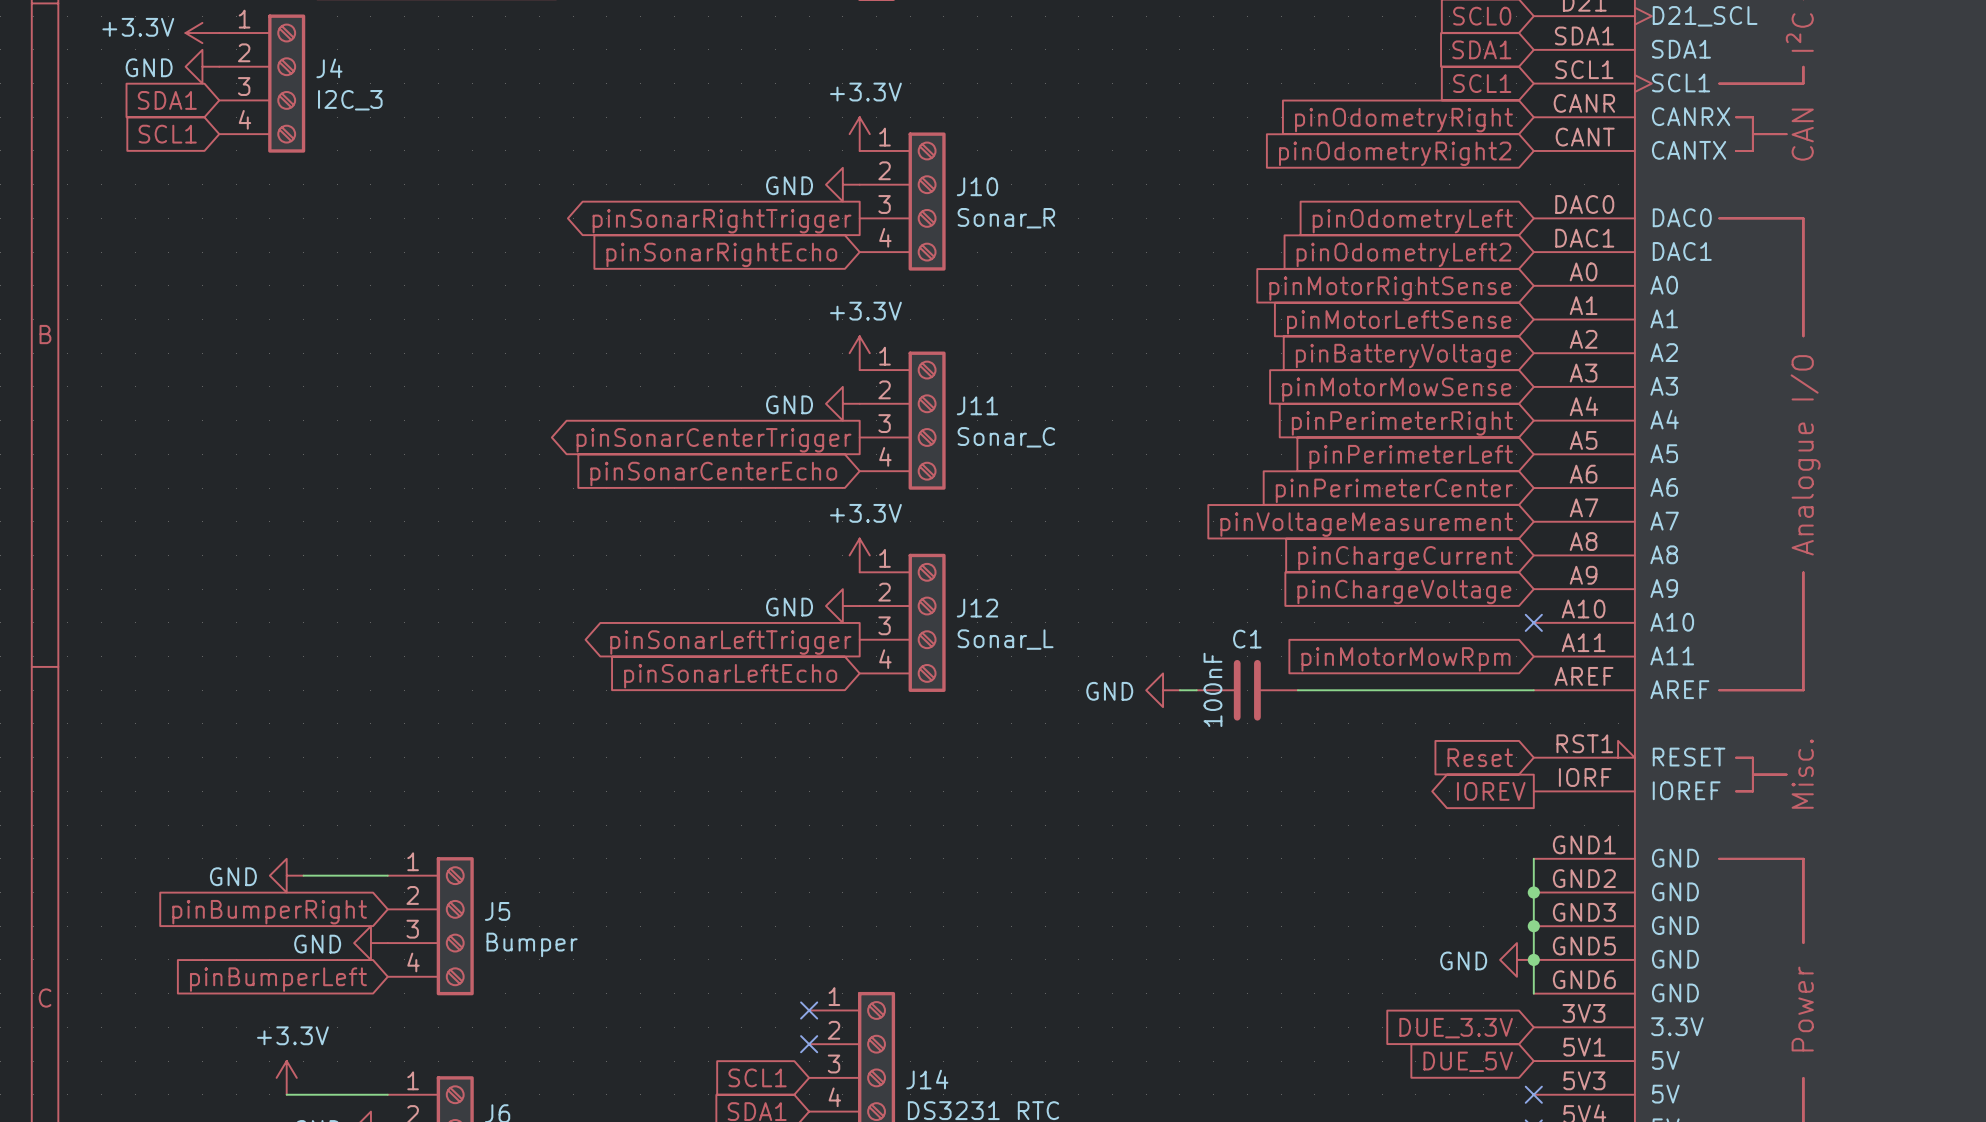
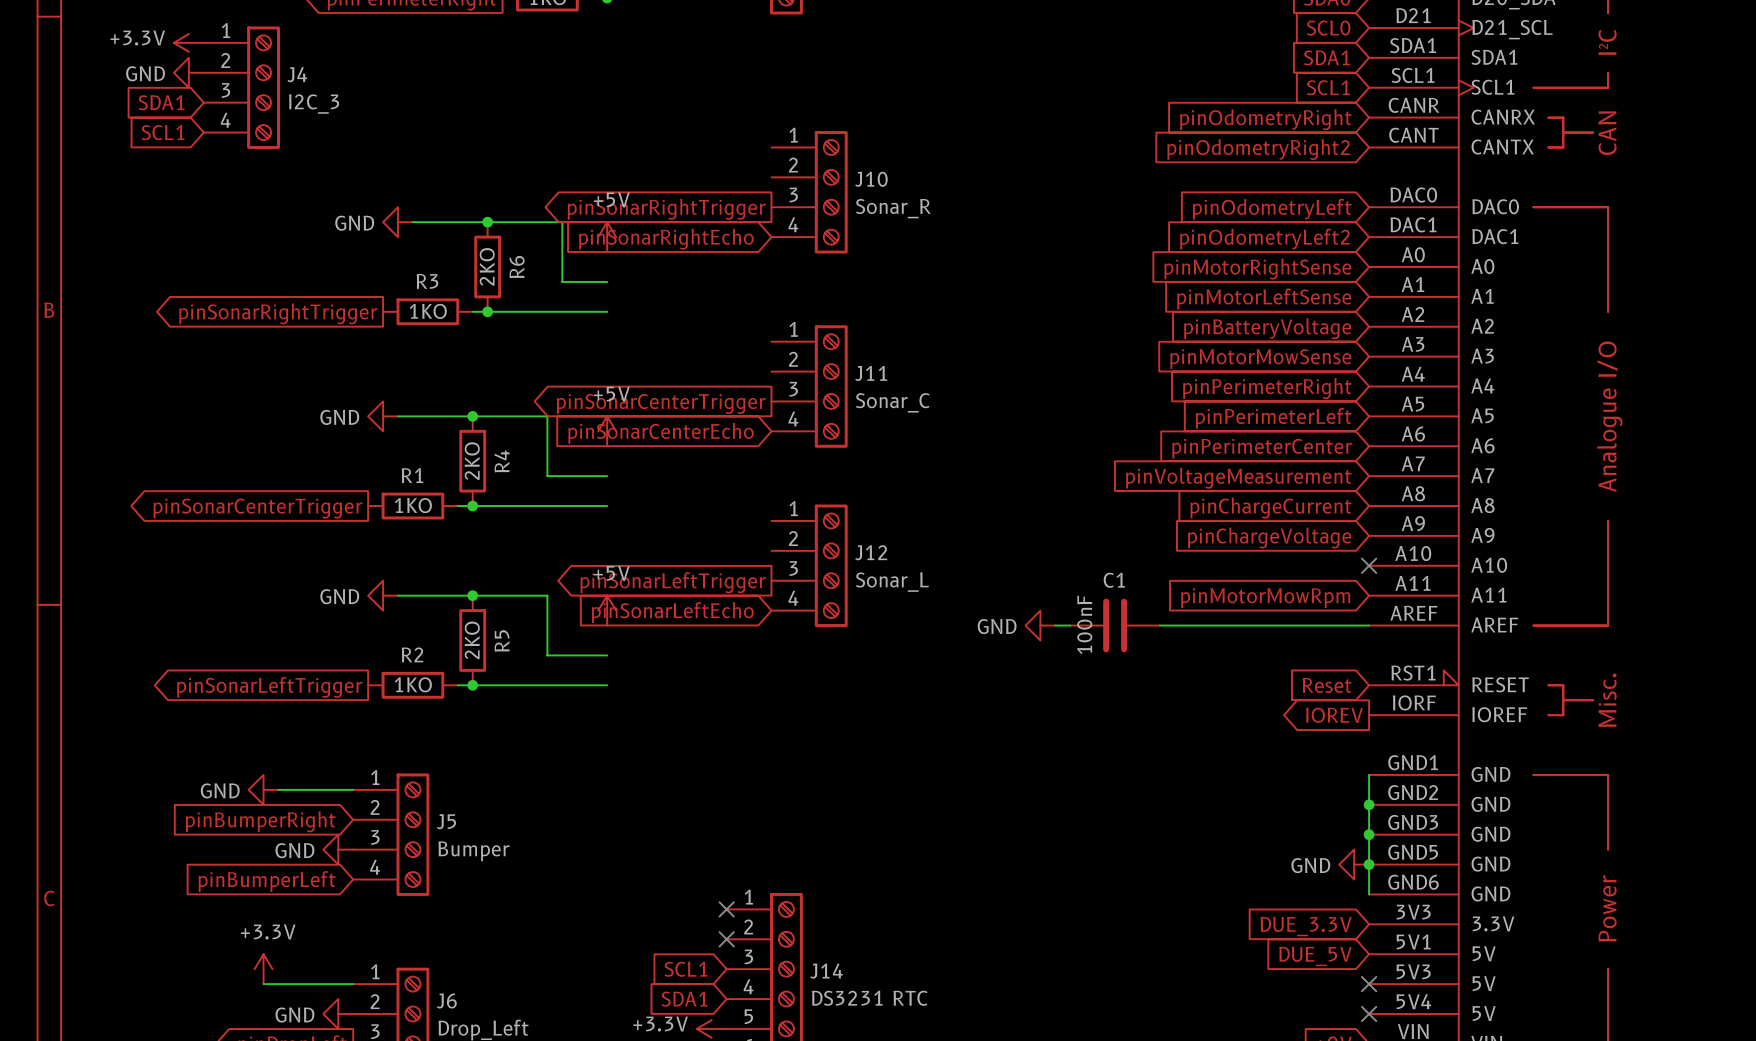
power symbol: +3.3V (859, 134) -> none
power symbol: GND (842, 184) -> none
power symbol: none -> GND (398, 222)
wire: none -> (412, 222) (562, 222) (562, 281) (607, 281)
junction: none -> (487, 222)
power symbol: none -> +5V (607, 237)
R6: none -> 2KO (487, 266)
R3: none -> 1KO (427, 311)
wire: none -> (472, 311) (607, 311)
junction: none -> (487, 311)
global label: none -> pinSonarRightTrigger (278, 313)
power symbol: +3.3V (859, 353) -> none
power symbol: GND (842, 403) -> none
power symbol: none -> GND (383, 416)
wire: none -> (398, 416) (547, 416) (547, 476) (607, 476)
junction: none -> (472, 416)
power symbol: none -> +5V (607, 431)
R4: none -> 2KO (472, 461)
R1: none -> 1KO (412, 506)
wire: none -> (457, 506) (607, 506)
junction: none -> (472, 506)
power symbol: +3.3V (859, 555) -> none
global label: none -> pinSonarCenterTrigger (258, 508)
power symbol: GND (842, 606) -> none
power symbol: none -> GND (383, 595)
wire: none -> (398, 595) (547, 595) (547, 655) (607, 655)
junction: none -> (472, 595)
power symbol: none -> +5V (607, 610)
R5: none -> 2KO (472, 640)
R2: none -> 1KO (412, 685)
wire: none -> (457, 685) (607, 685)
junction: none -> (472, 685)
global label: none -> pinSonarLeftTrigger (269, 687)

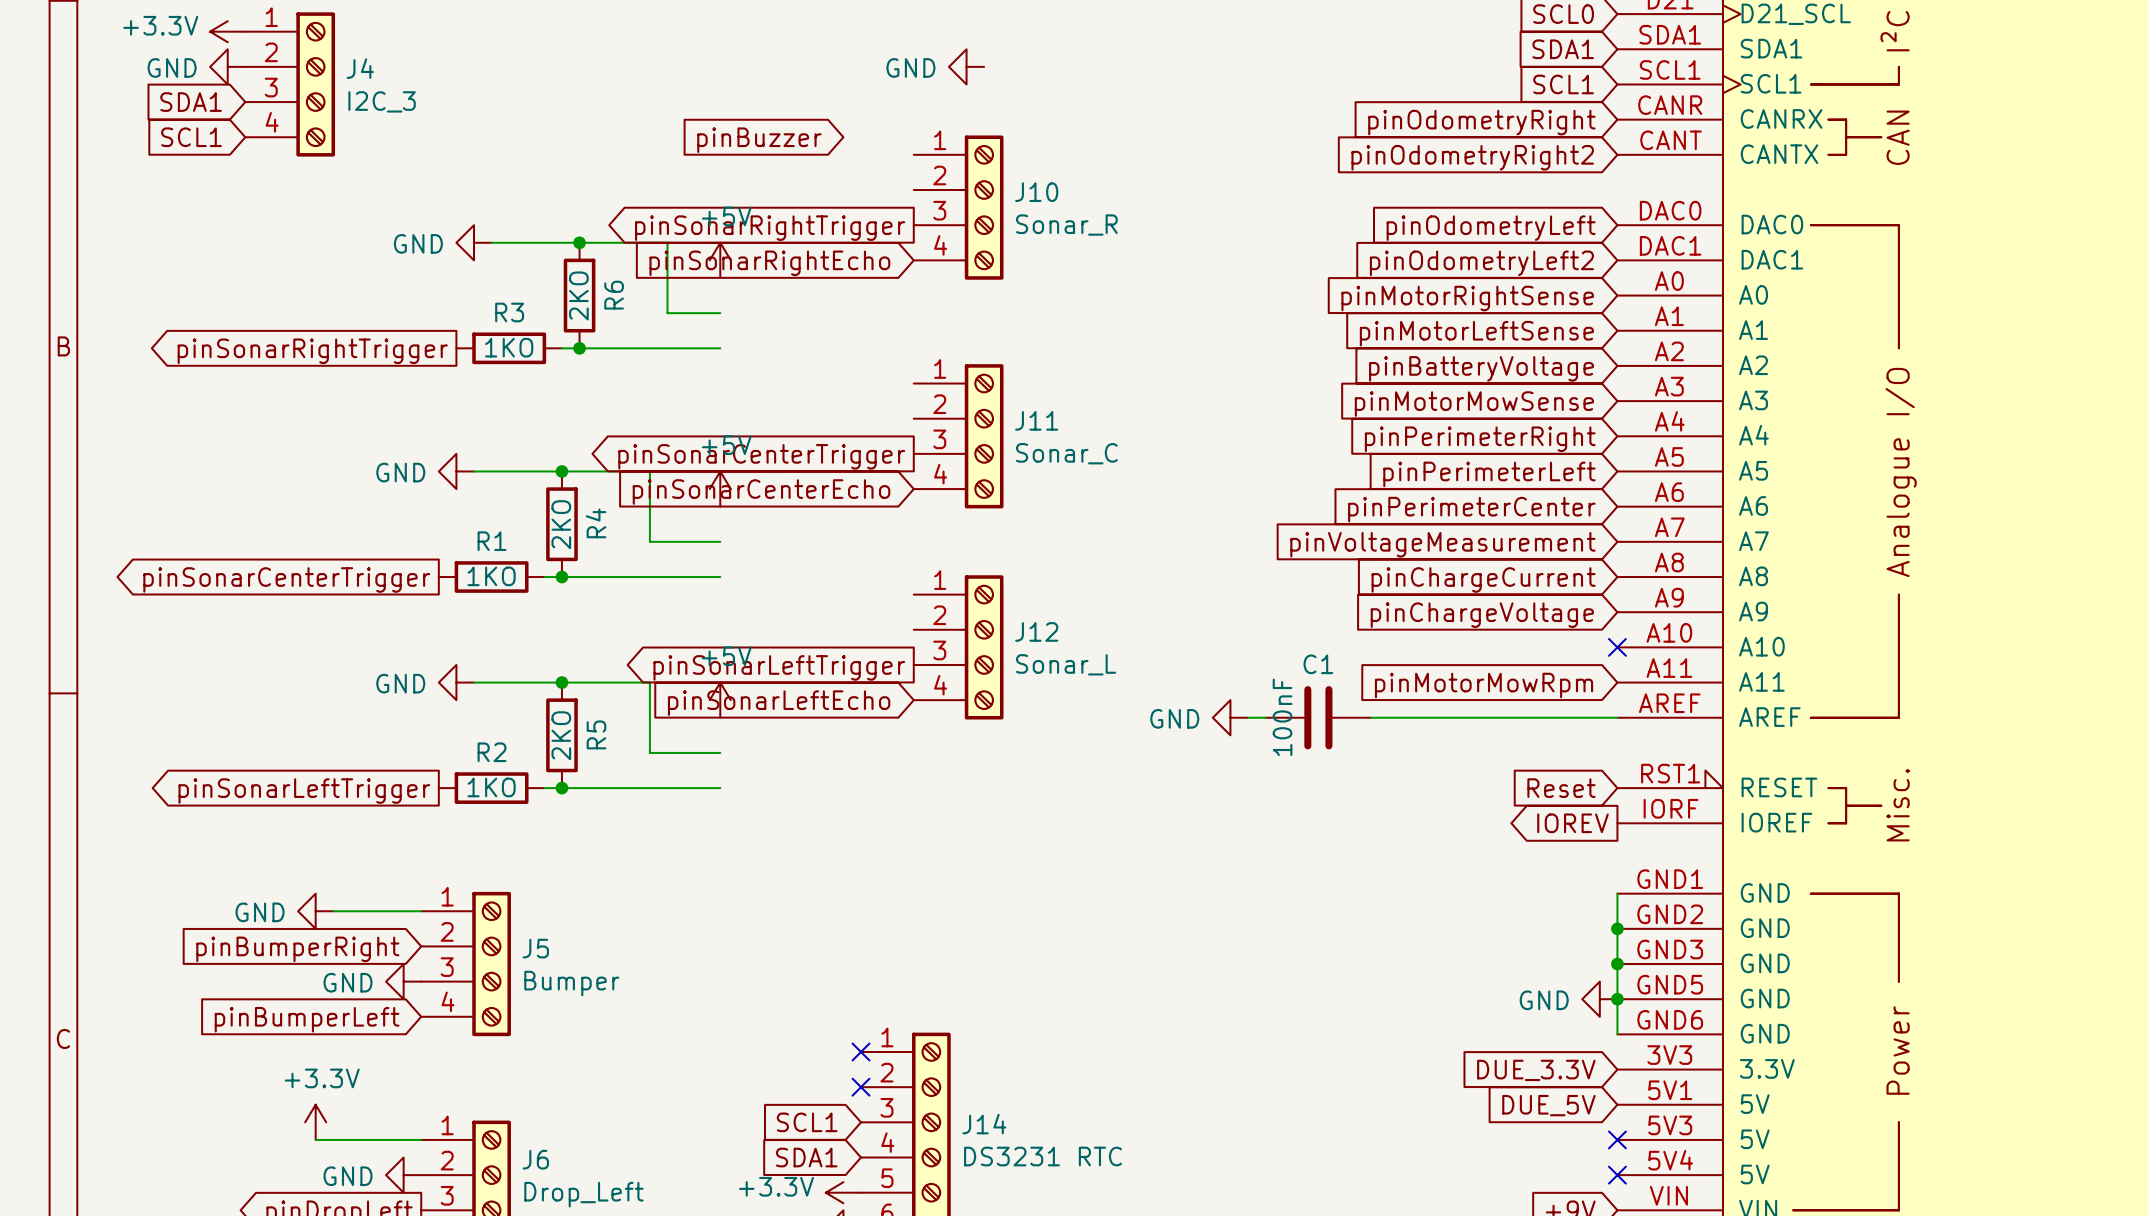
power symbol: none -> GND (966, 66)
global label: none -> pinBuzzer (759, 140)

